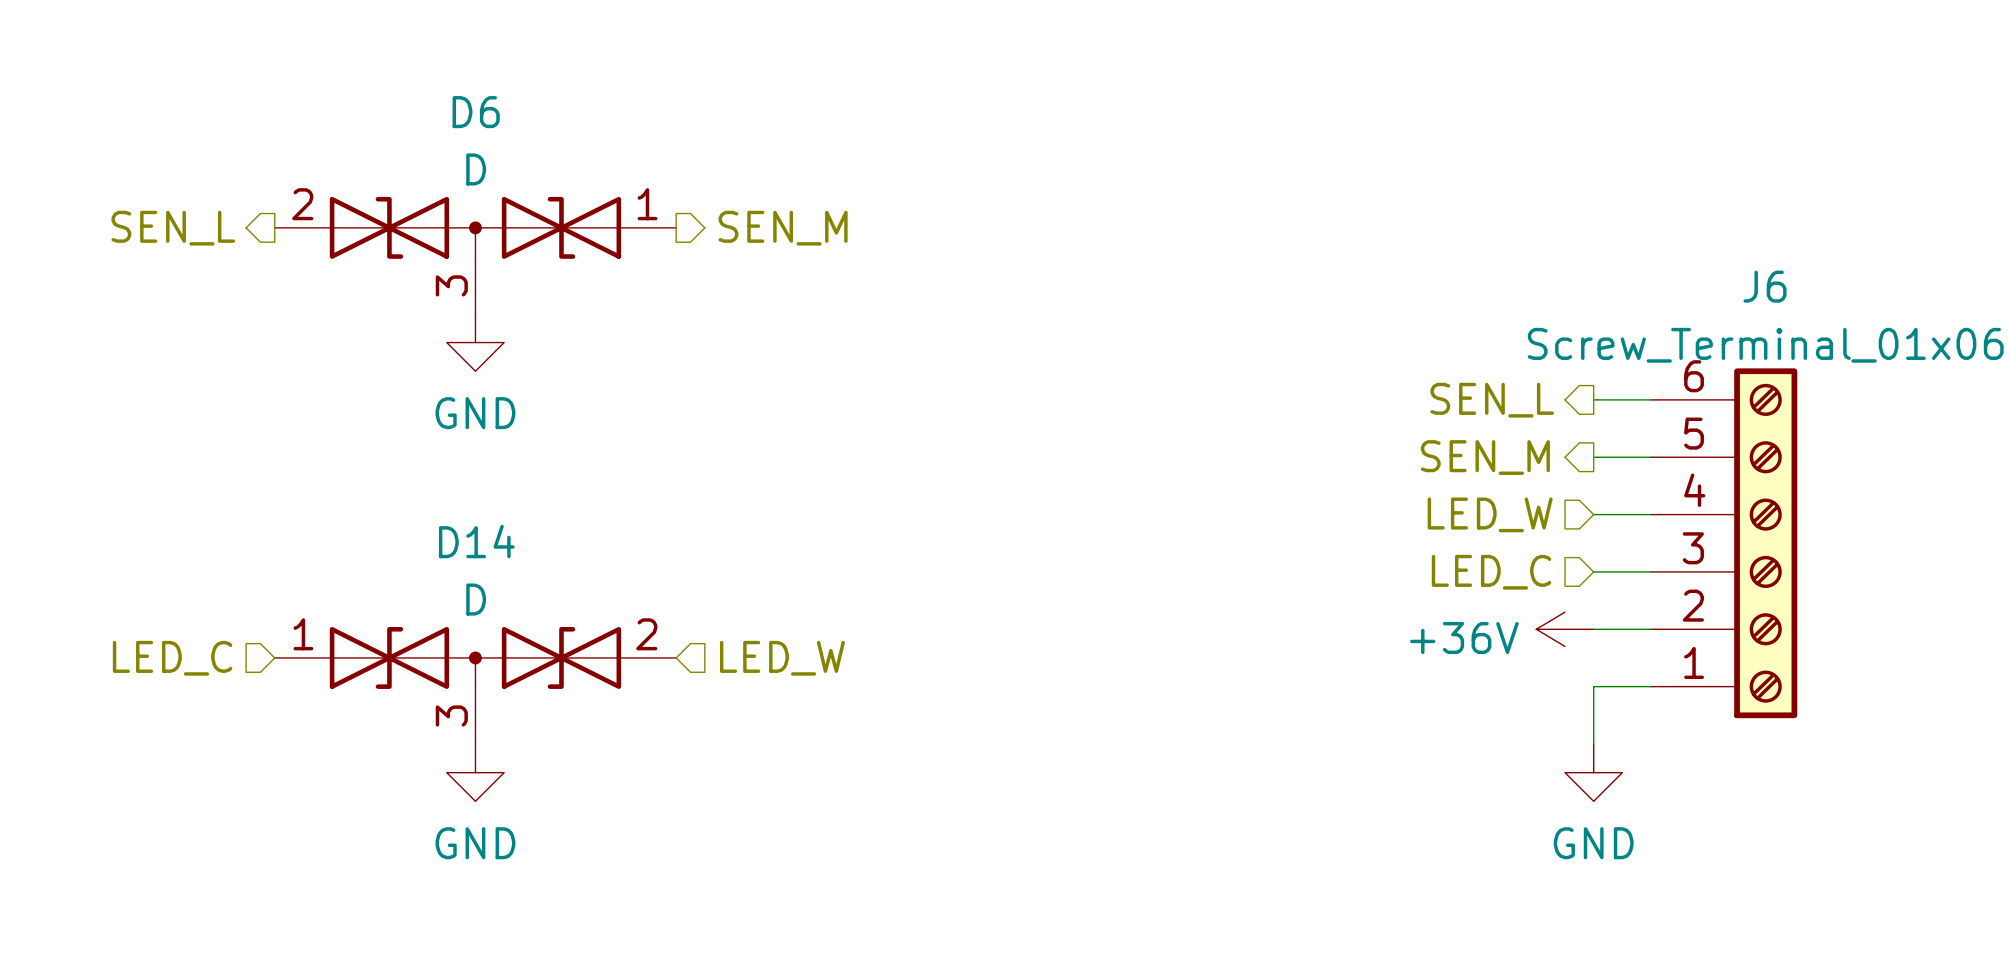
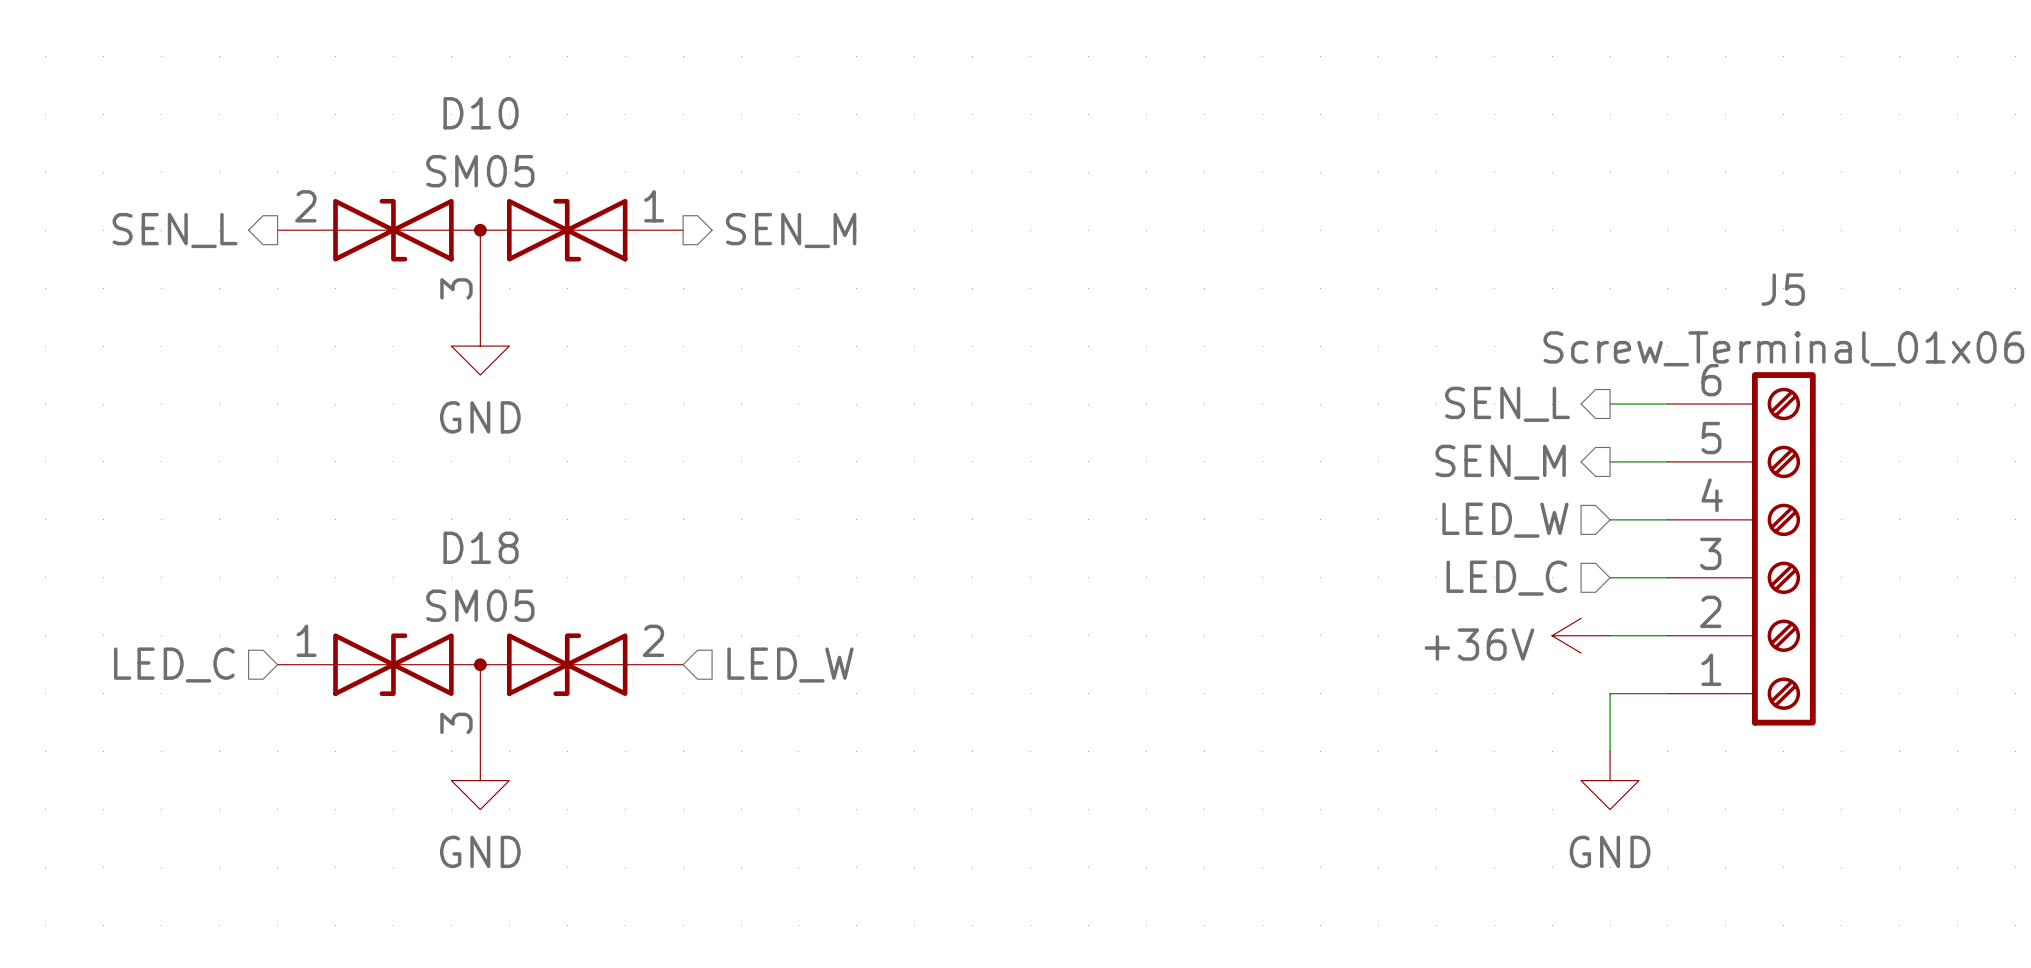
D6 name: D6 (476, 112) -> D10 (481, 113)
D6 value: D (476, 169) -> SM05 (480, 171)
J6 name: J6 (1765, 286) -> J5 (1783, 289)
D14 name: D14 (476, 541) -> D18 (481, 547)
D14 value: D (476, 599) -> SM05 (480, 605)

